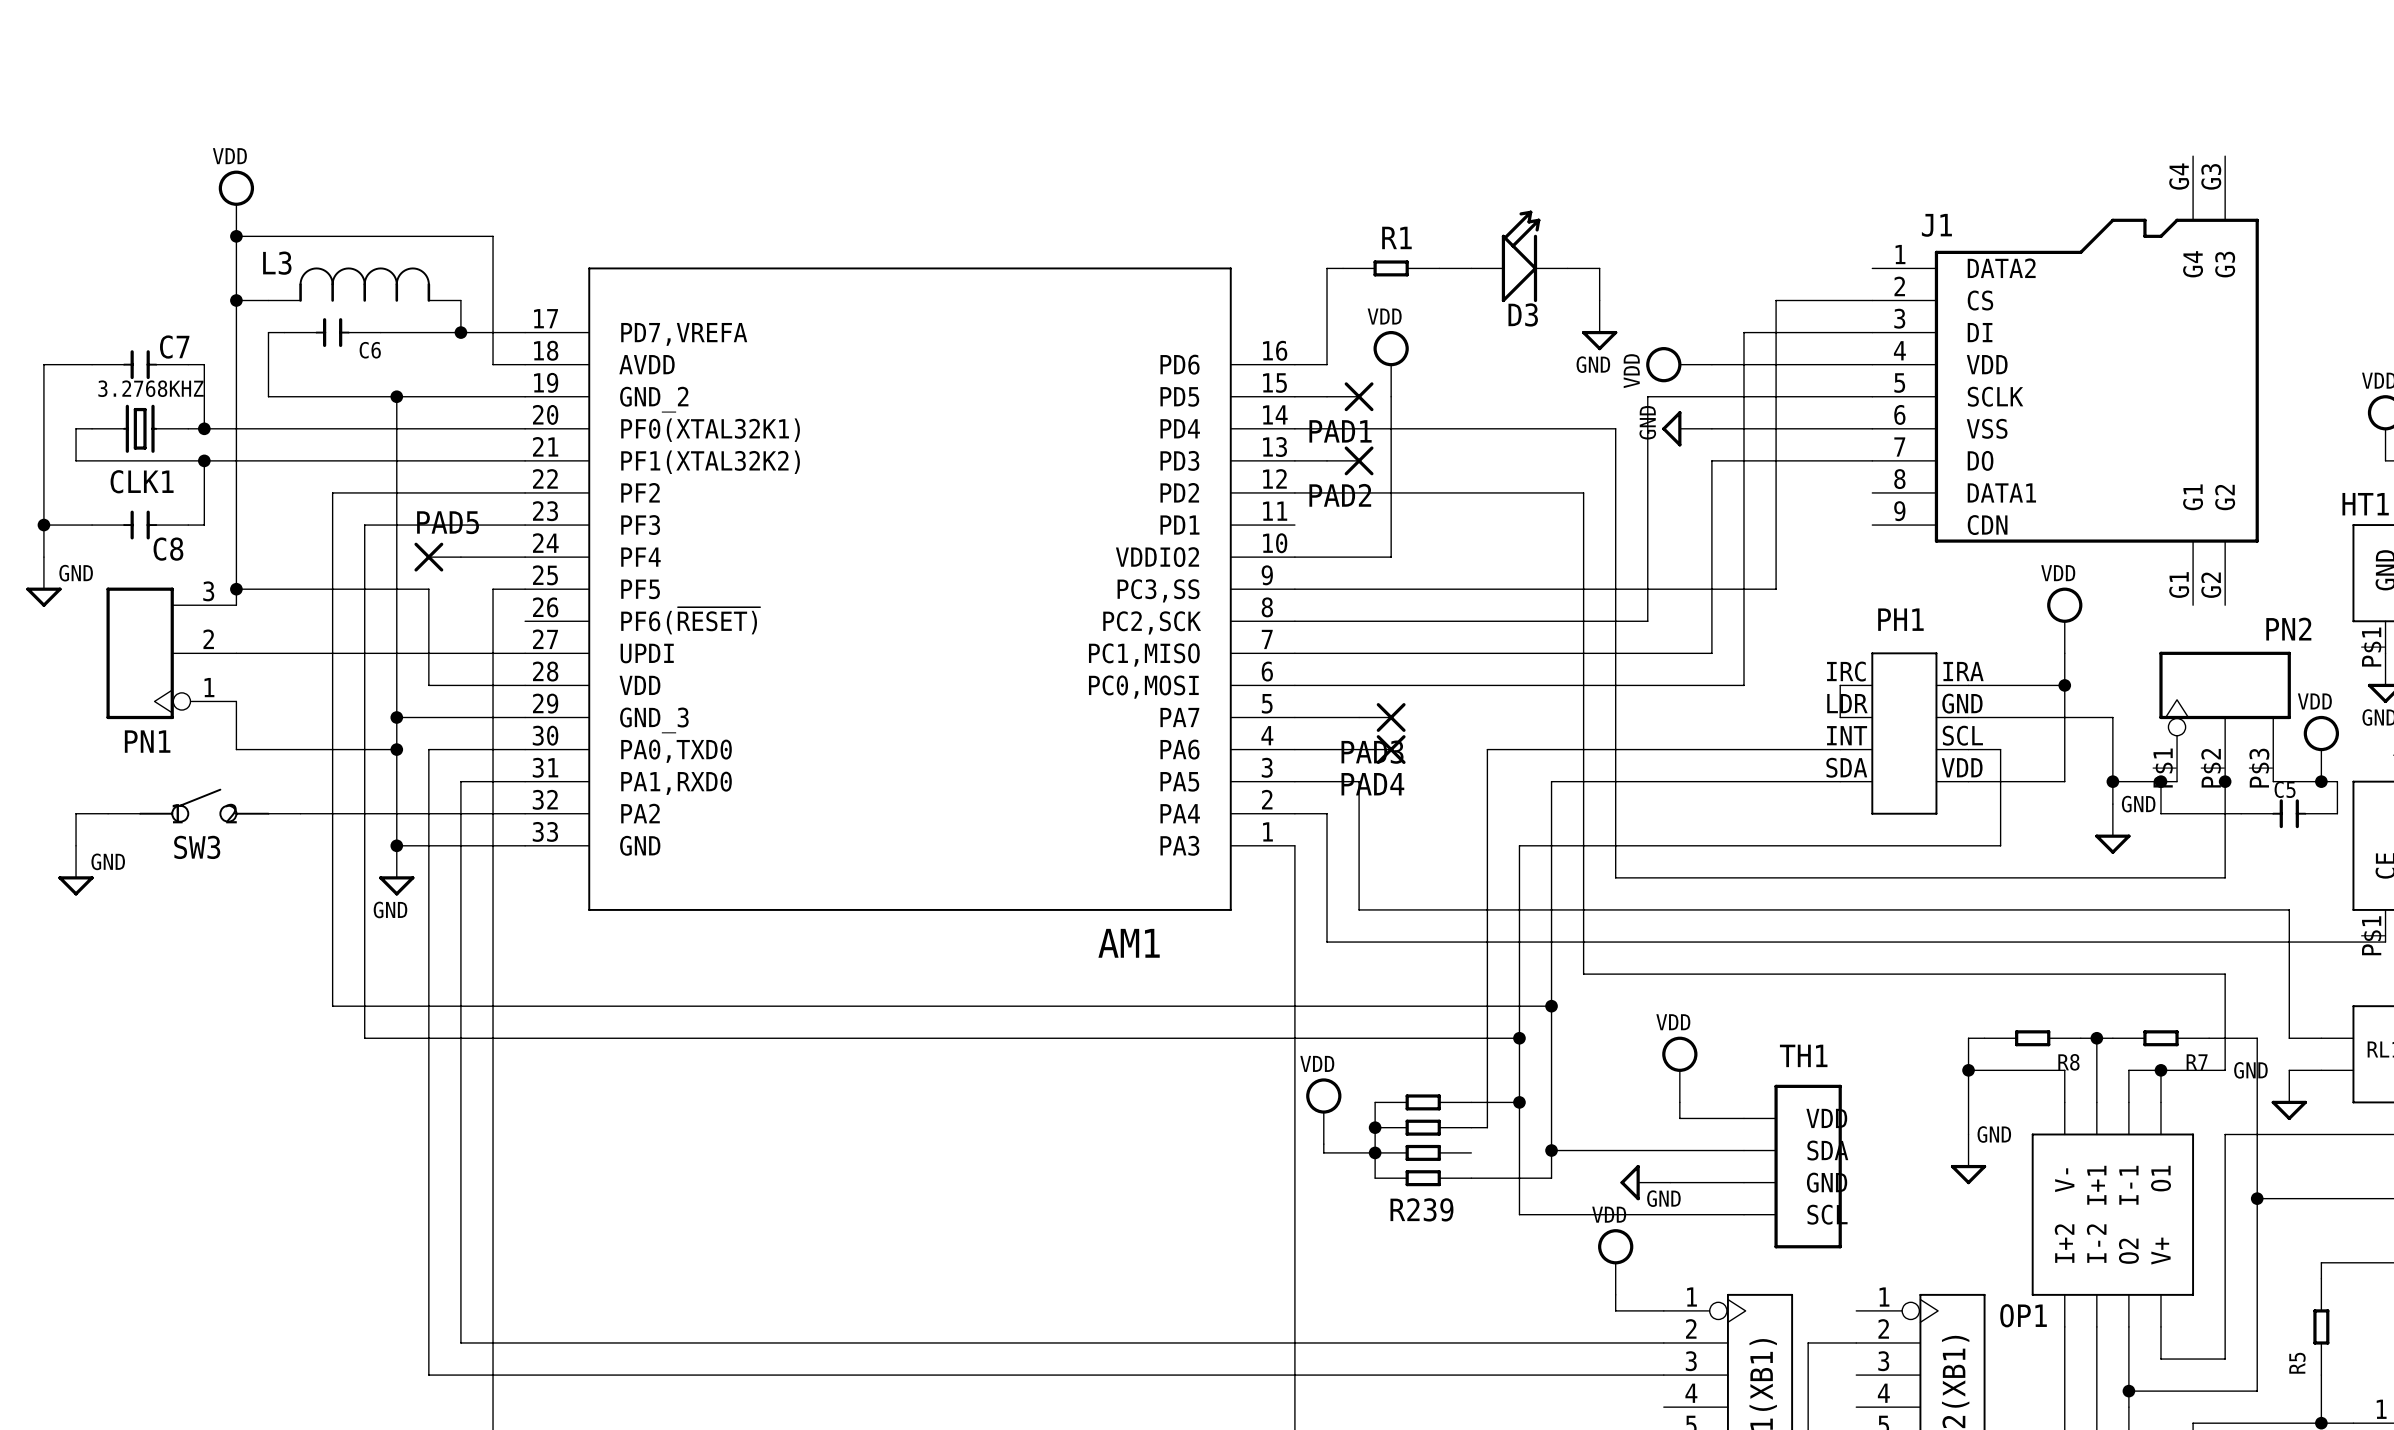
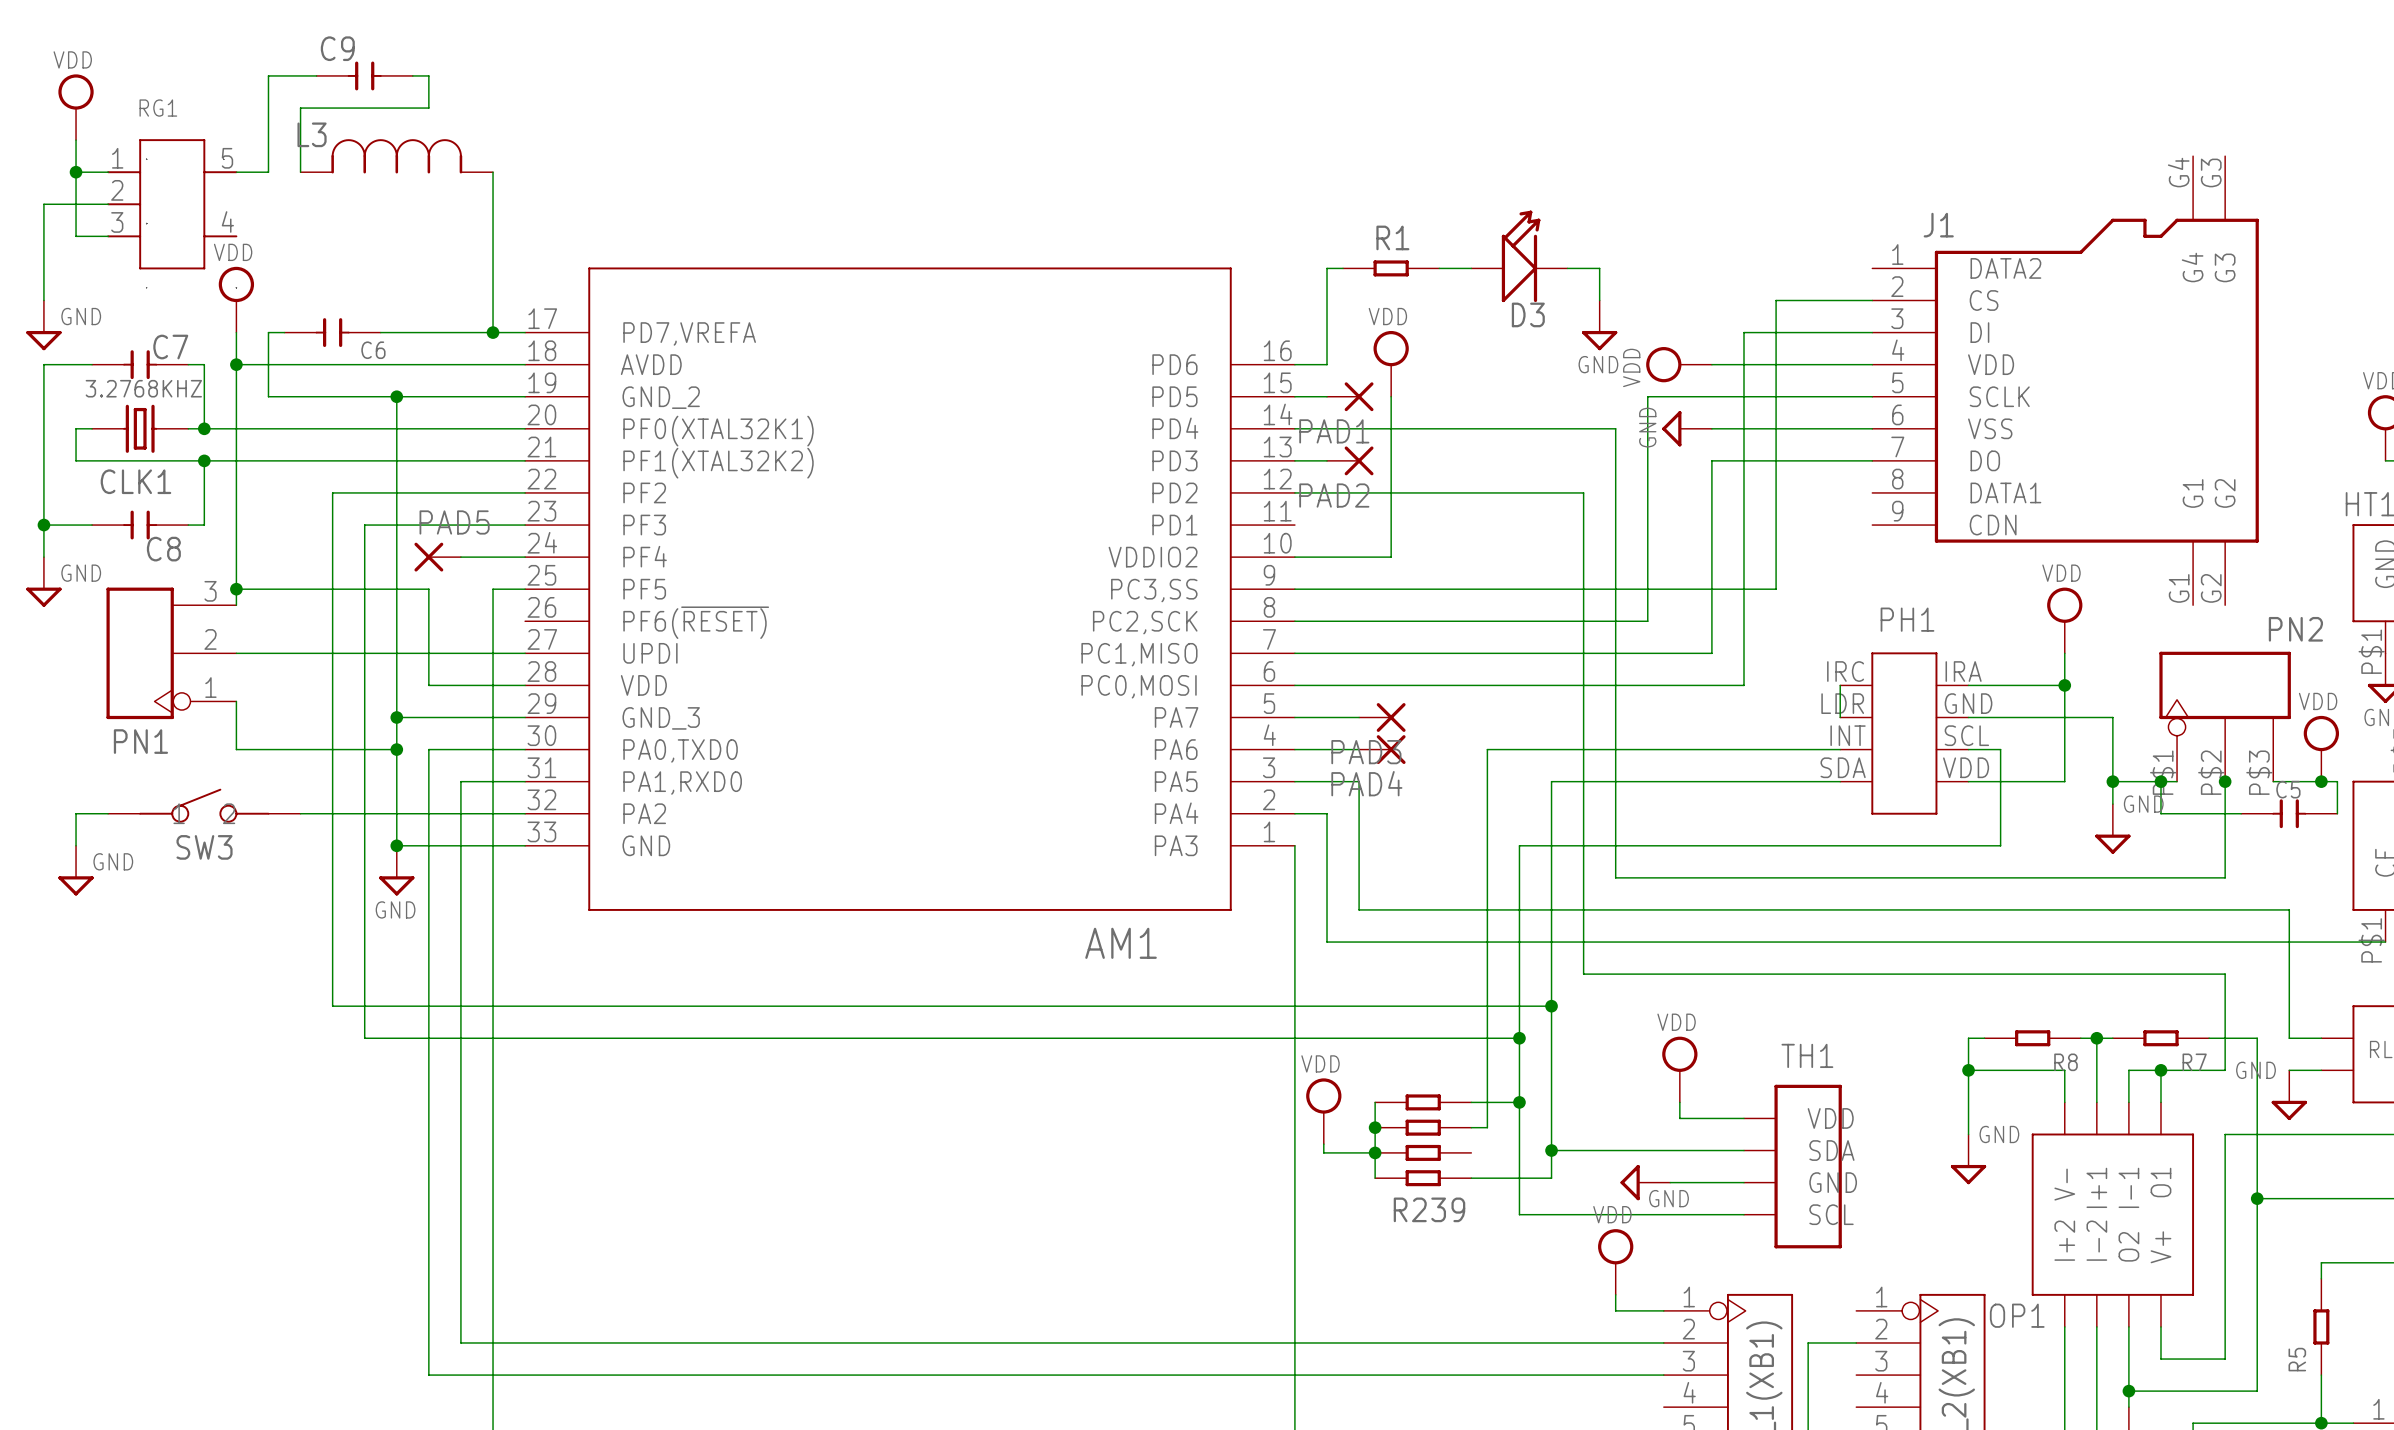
wire: none -> (316, 75) (268, 75) (268, 172) (236, 172)
C9: none -> (364, 75)
wire: none -> (412, 75) (428, 75) (428, 108) (300, 108) (300, 172)
power symbol: none -> VDD (76, 107)
wire: none -> (76, 140) (76, 236) (108, 236)
wire: none -> (76, 172) (108, 172)
junction: none -> (76, 172)
power symbol: VDD (236, 203) -> none
wire: none -> (108, 204) (43, 204) (43, 300)
RG1: none -> (172, 204)
junction: (236, 236) -> none
wire: (493, 236) (236, 236) (236, 332) -> (493, 236) (493, 172)
L3 position: (364, 284) -> (396, 156)
power symbol: none -> VDD (236, 299)
wire: (236, 300) (268, 300) -> none
junction: (236, 300) -> none
wire: (460, 300) (460, 332) -> none
power symbol: none -> GND (43, 325)
junction position: (460, 332) -> (493, 332)
wire: (493, 332) (493, 364) -> (236, 364) (493, 364)
junction: none -> (236, 364)

